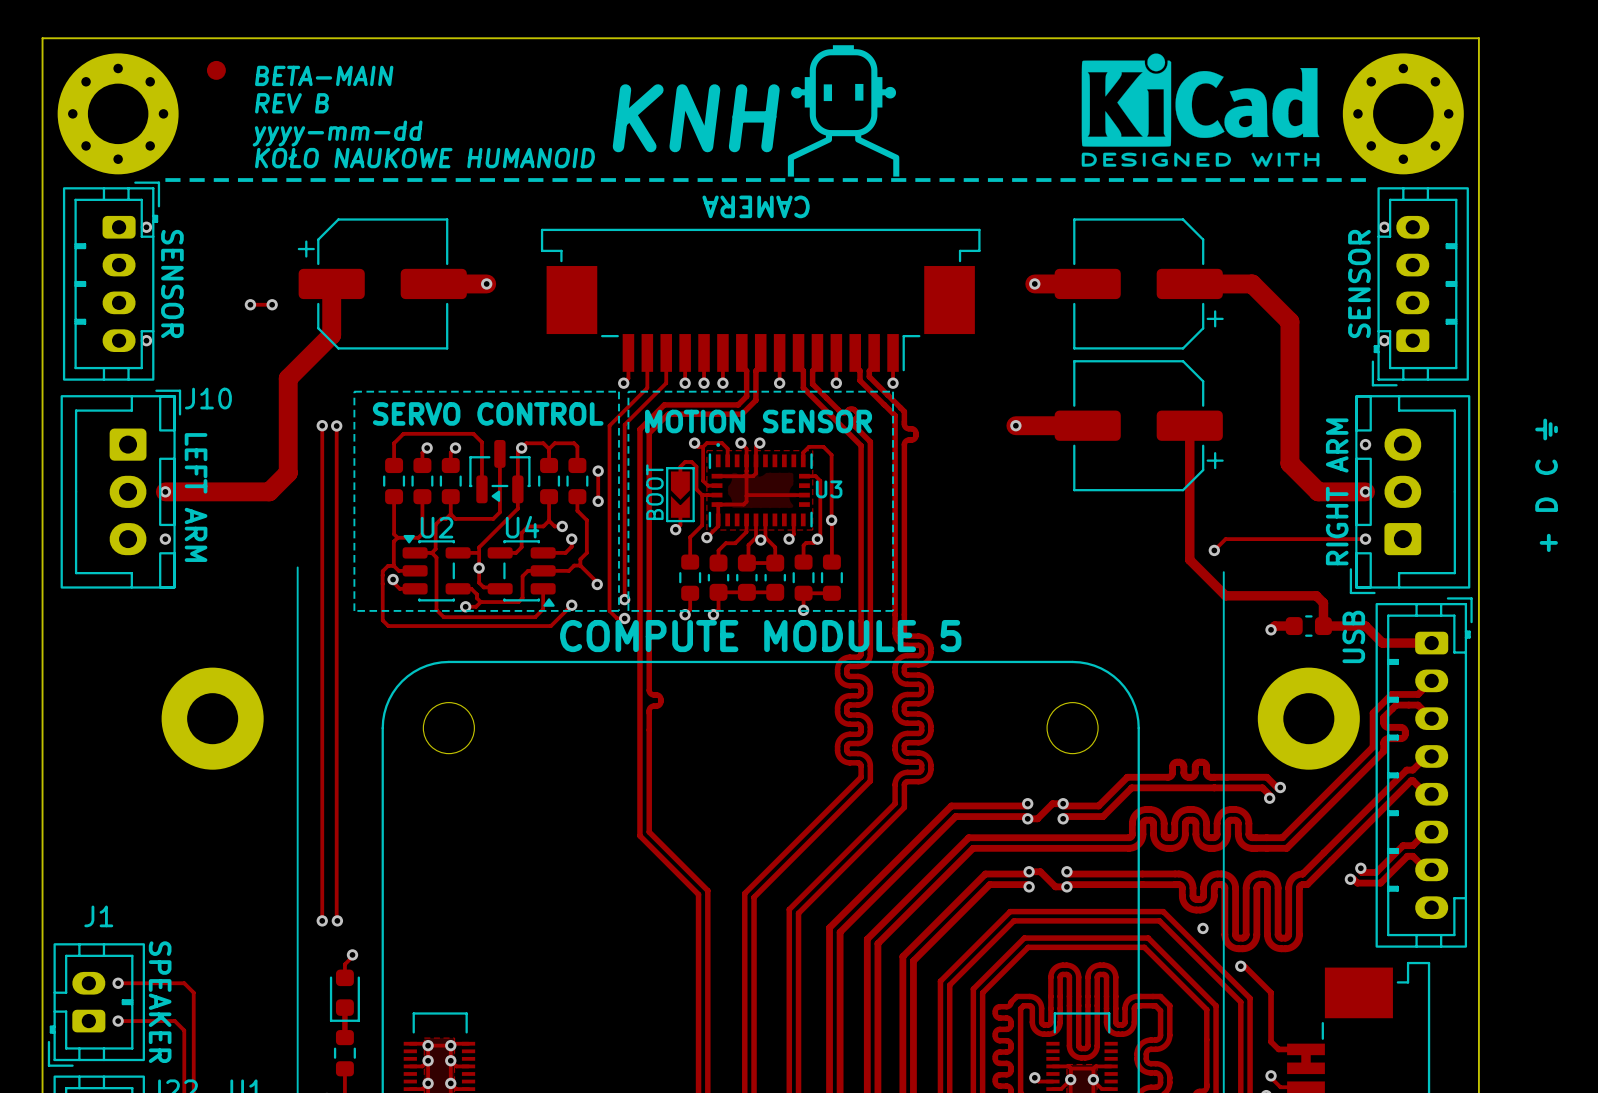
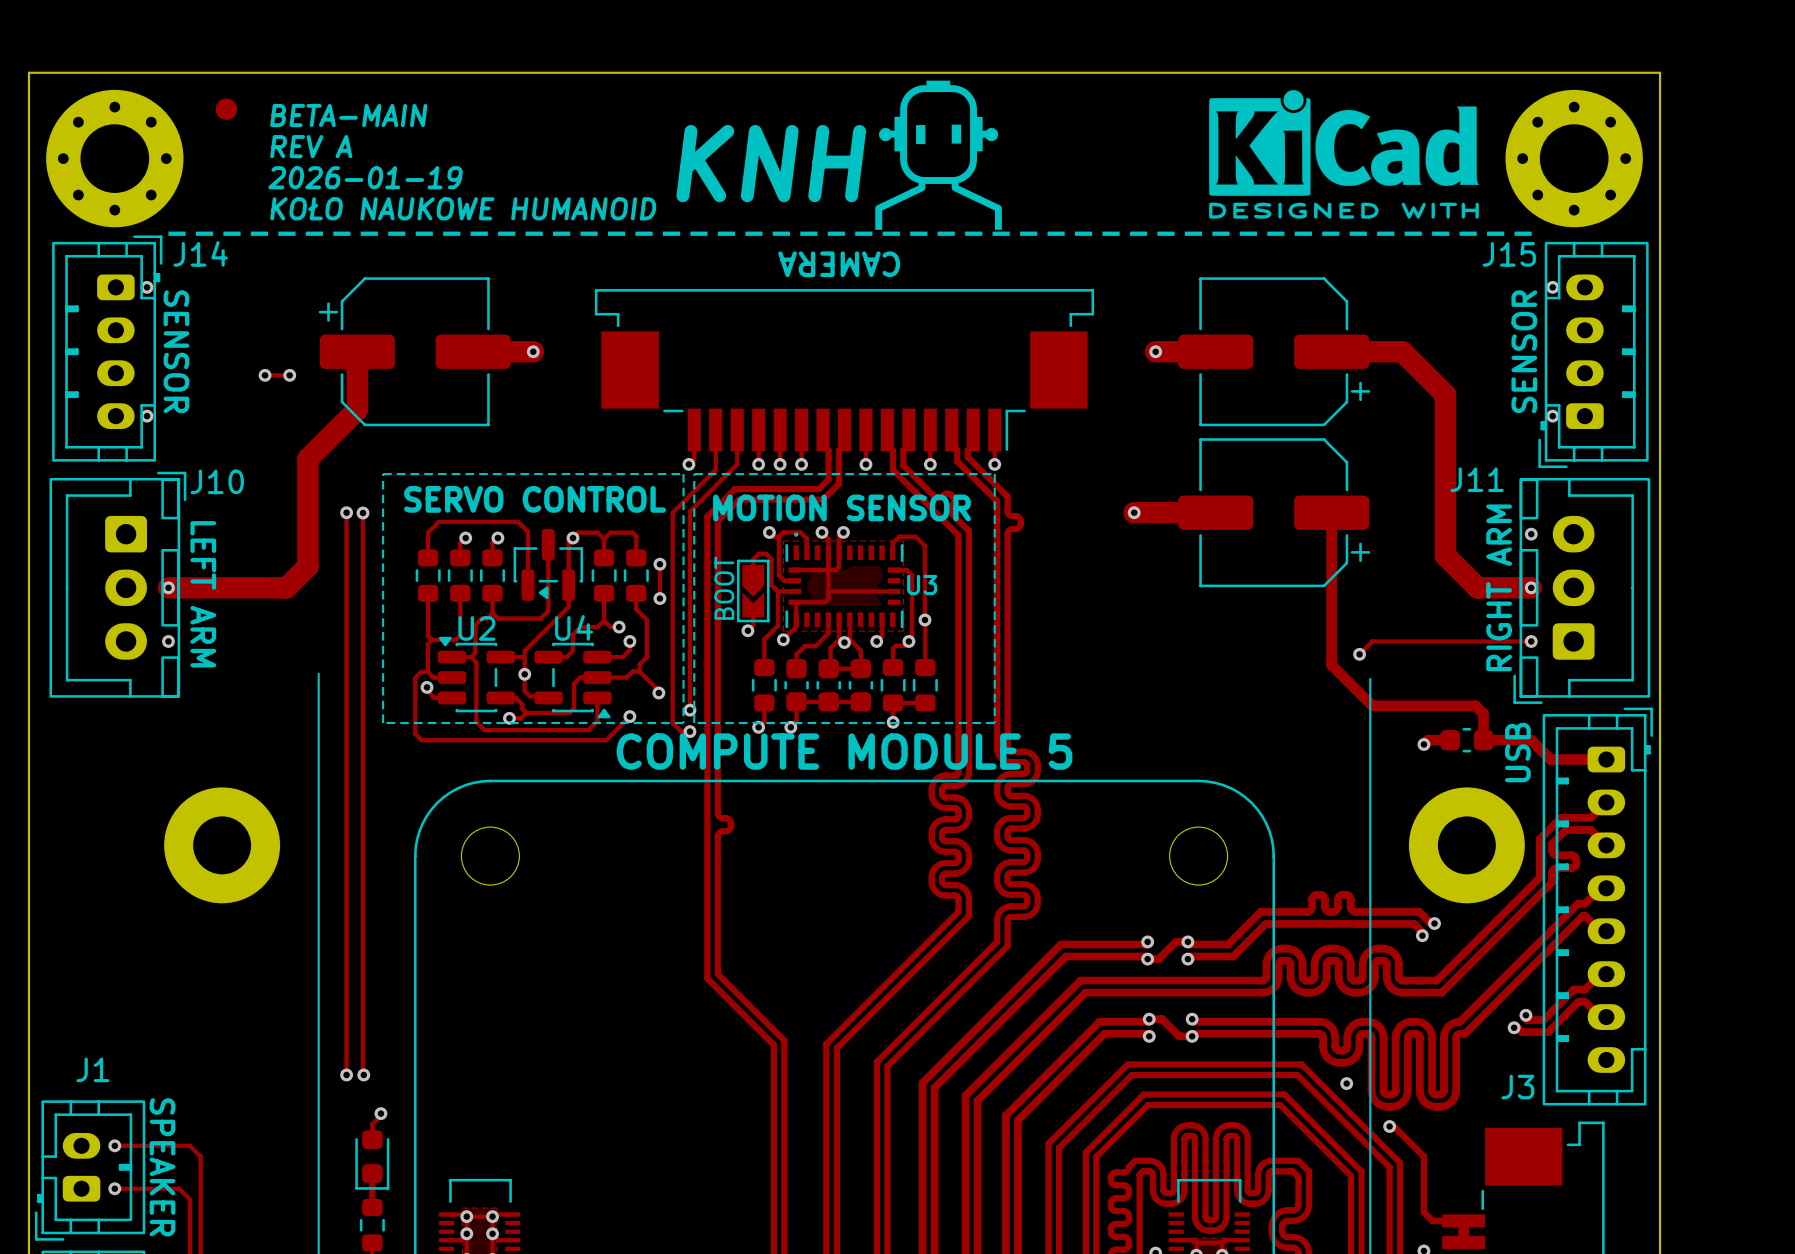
text: REV B (292, 103) -> REV A (311, 146)
text: yyyy-mm-dd (337, 133) -> 2026-01-19 (365, 177)
J14 name: none -> J14 (200, 253)
J15 name: none -> J15 (1509, 254)
J11 name: none -> J11 (1477, 479)
text: ⏚ (1546, 429) -> none
text: C (1546, 467) -> none
text: D (1546, 504) -> none
text: + (1548, 542) -> none
J3 name: none -> J3 (1517, 1087)

